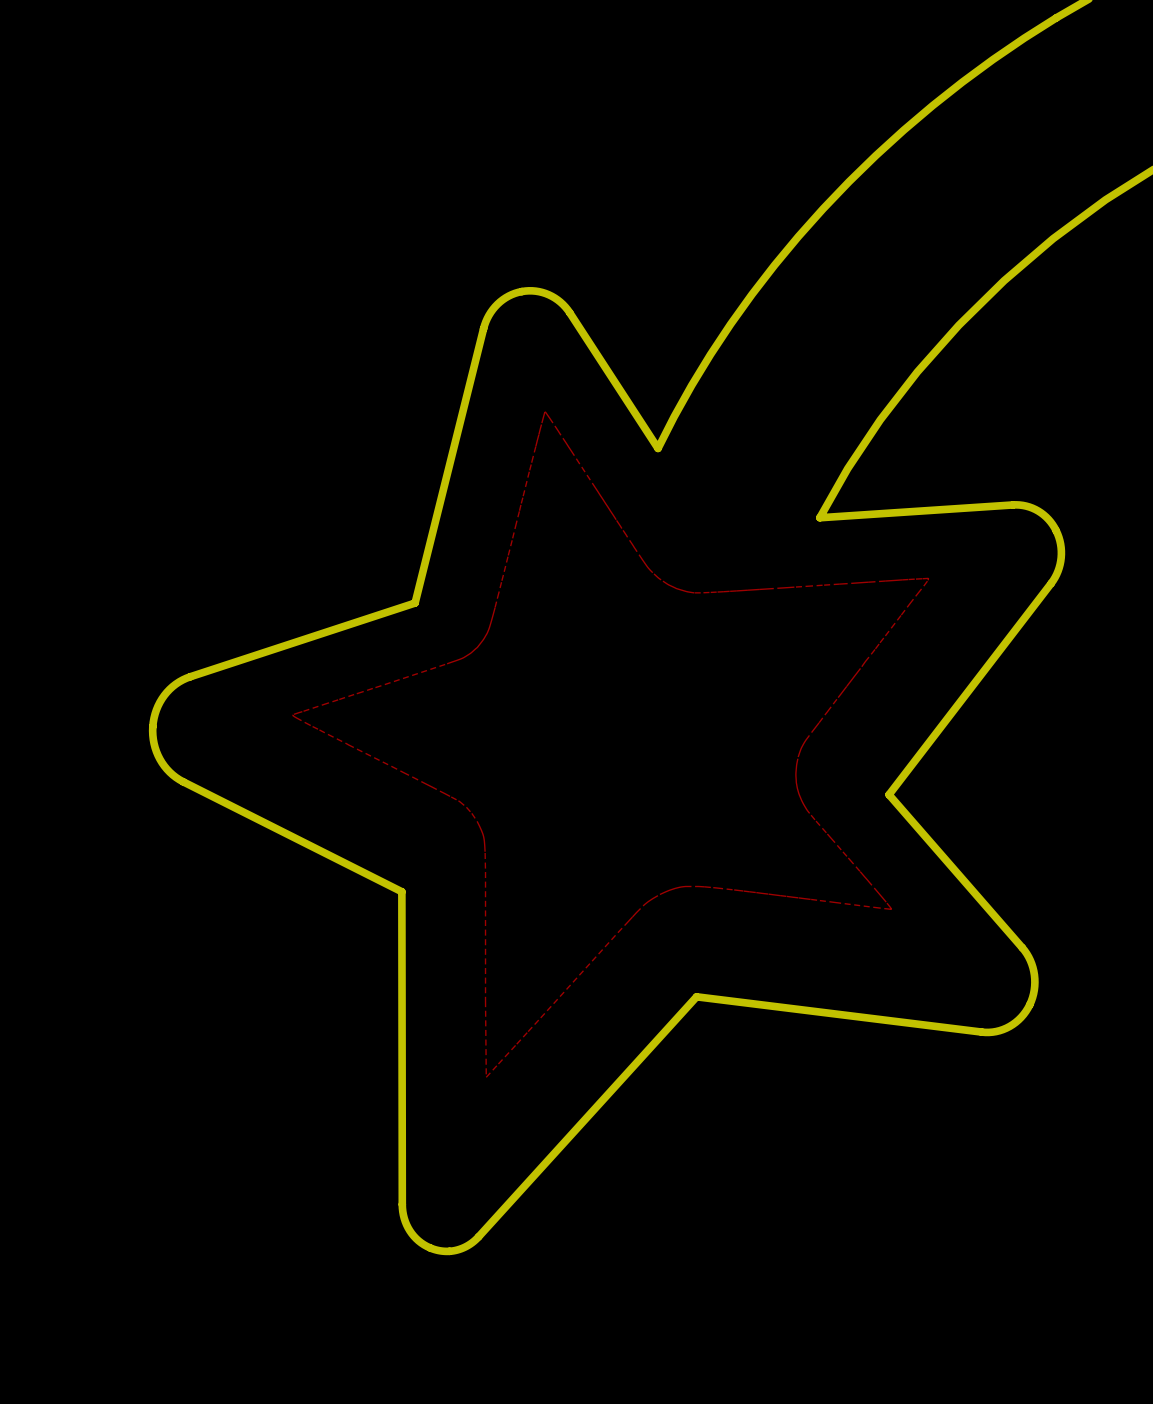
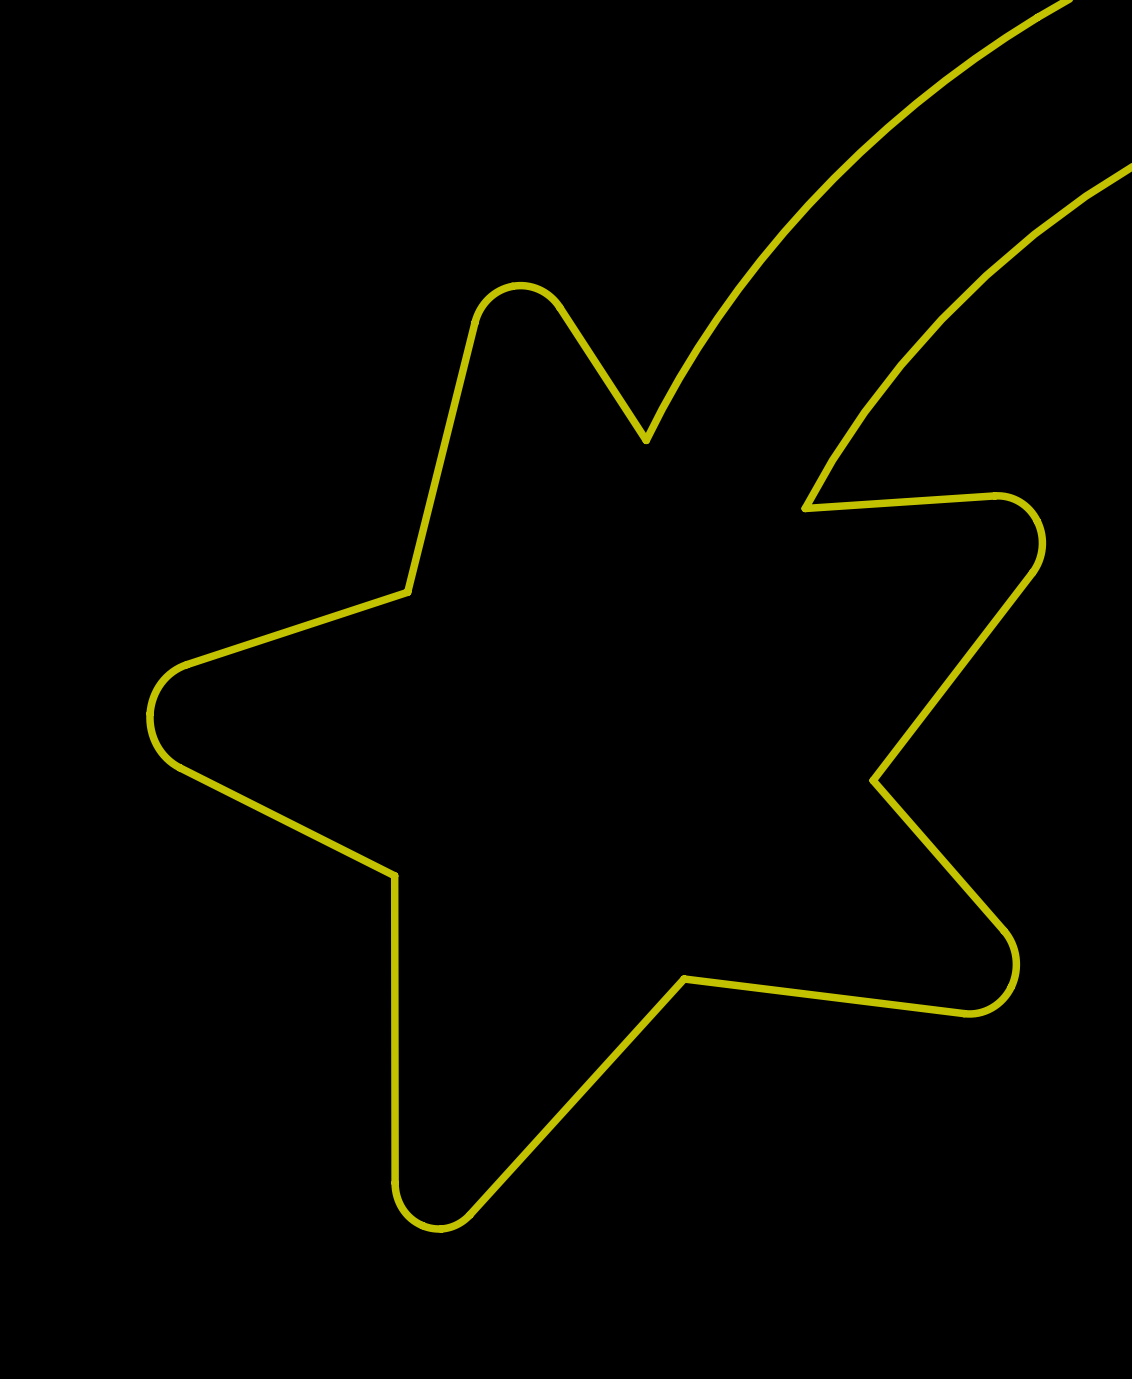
zone outline: (544, 411) (492, 617) (487, 633) (478, 645) -> none
zone outline: (545, 412) (647, 567) (658, 578) (676, 588) (700, 592) (928, 578) -> none
zone outline: (928, 579) (805, 740) (796, 764) (797, 788) (806, 809) (891, 909) (704, 886) (682, 886) (667, 891) (648, 901) (636, 912) (486, 1077) (485, 852) (483, 836) (477, 821) (466, 807) (458, 800) (292, 715) -> none
zone outline: (478, 646) (471, 652) -> none
zone outline: (471, 653) (455, 661) (292, 714) -> none

